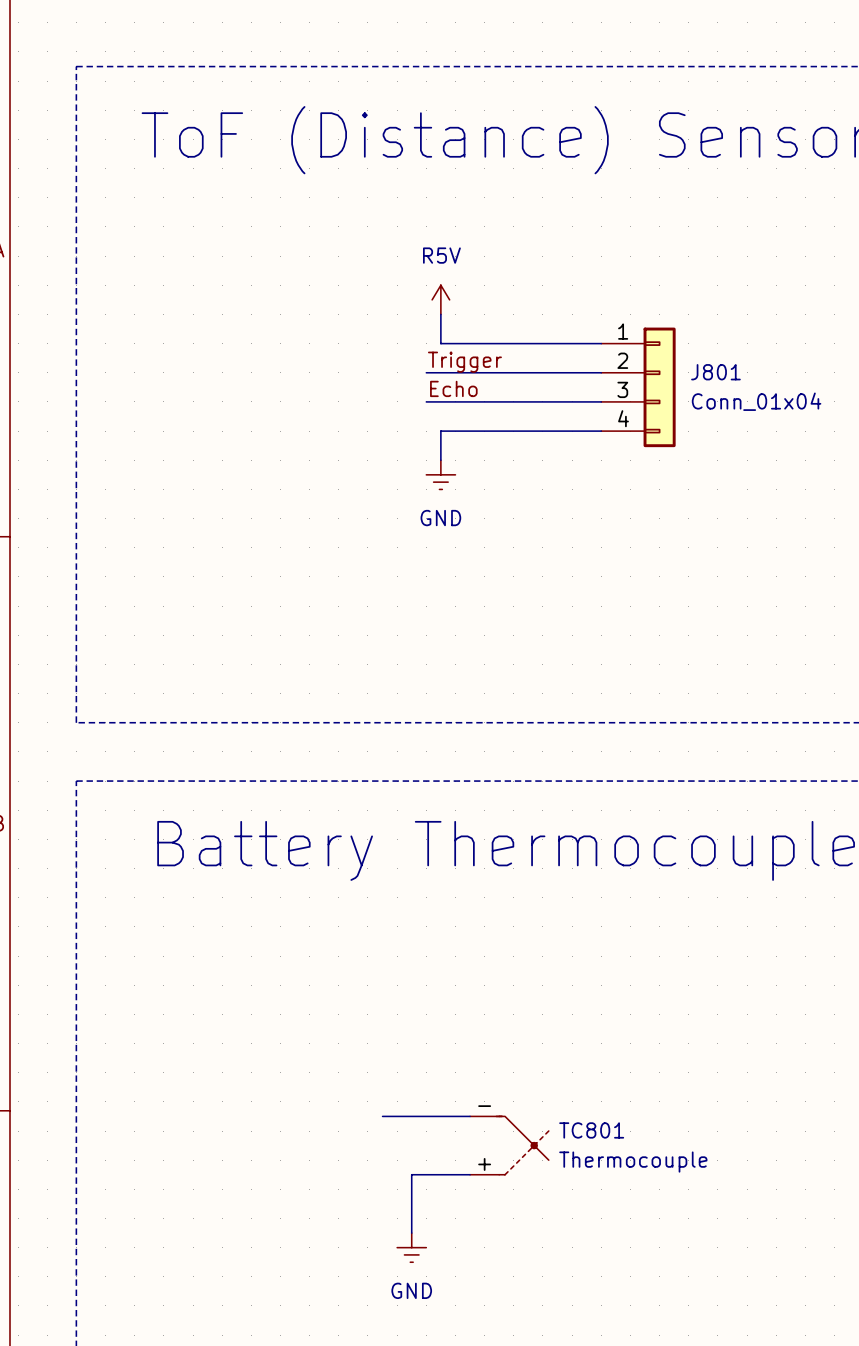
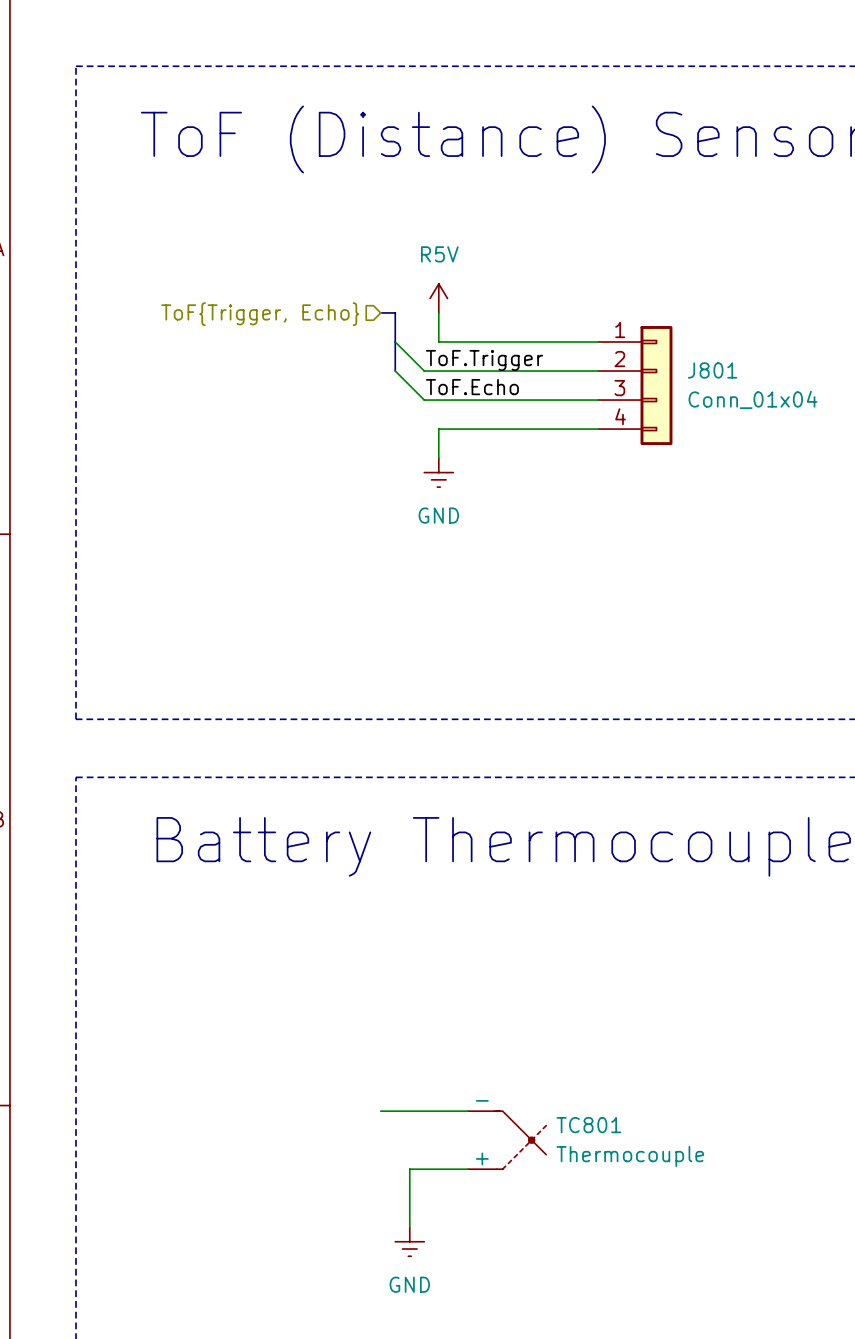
bus: none -> (380, 312) (395, 312) (395, 371)
hierarchical label: none -> ToF{Trigger, Echo} (260, 314)
wire: none -> (395, 341) (424, 371)
label: Trigger (464, 362) -> ToF.Trigger (484, 360)
wire: none -> (395, 371) (424, 400)
label: Echo (453, 388) -> ToF.Echo (472, 387)

